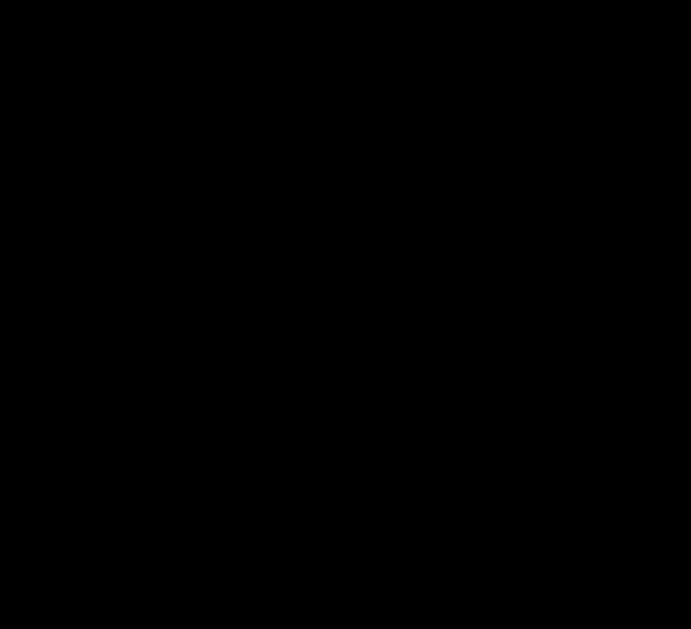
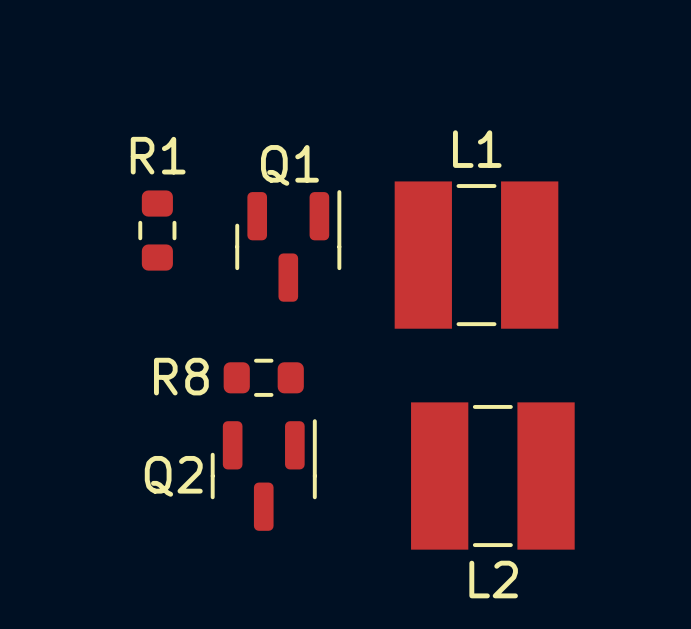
R1: none -> (157, 230)
Q1: none -> (288, 245)
L1: none -> (476, 255)
R8: none -> (263, 377)
Q2: none -> (263, 475)
L2: none -> (492, 476)

